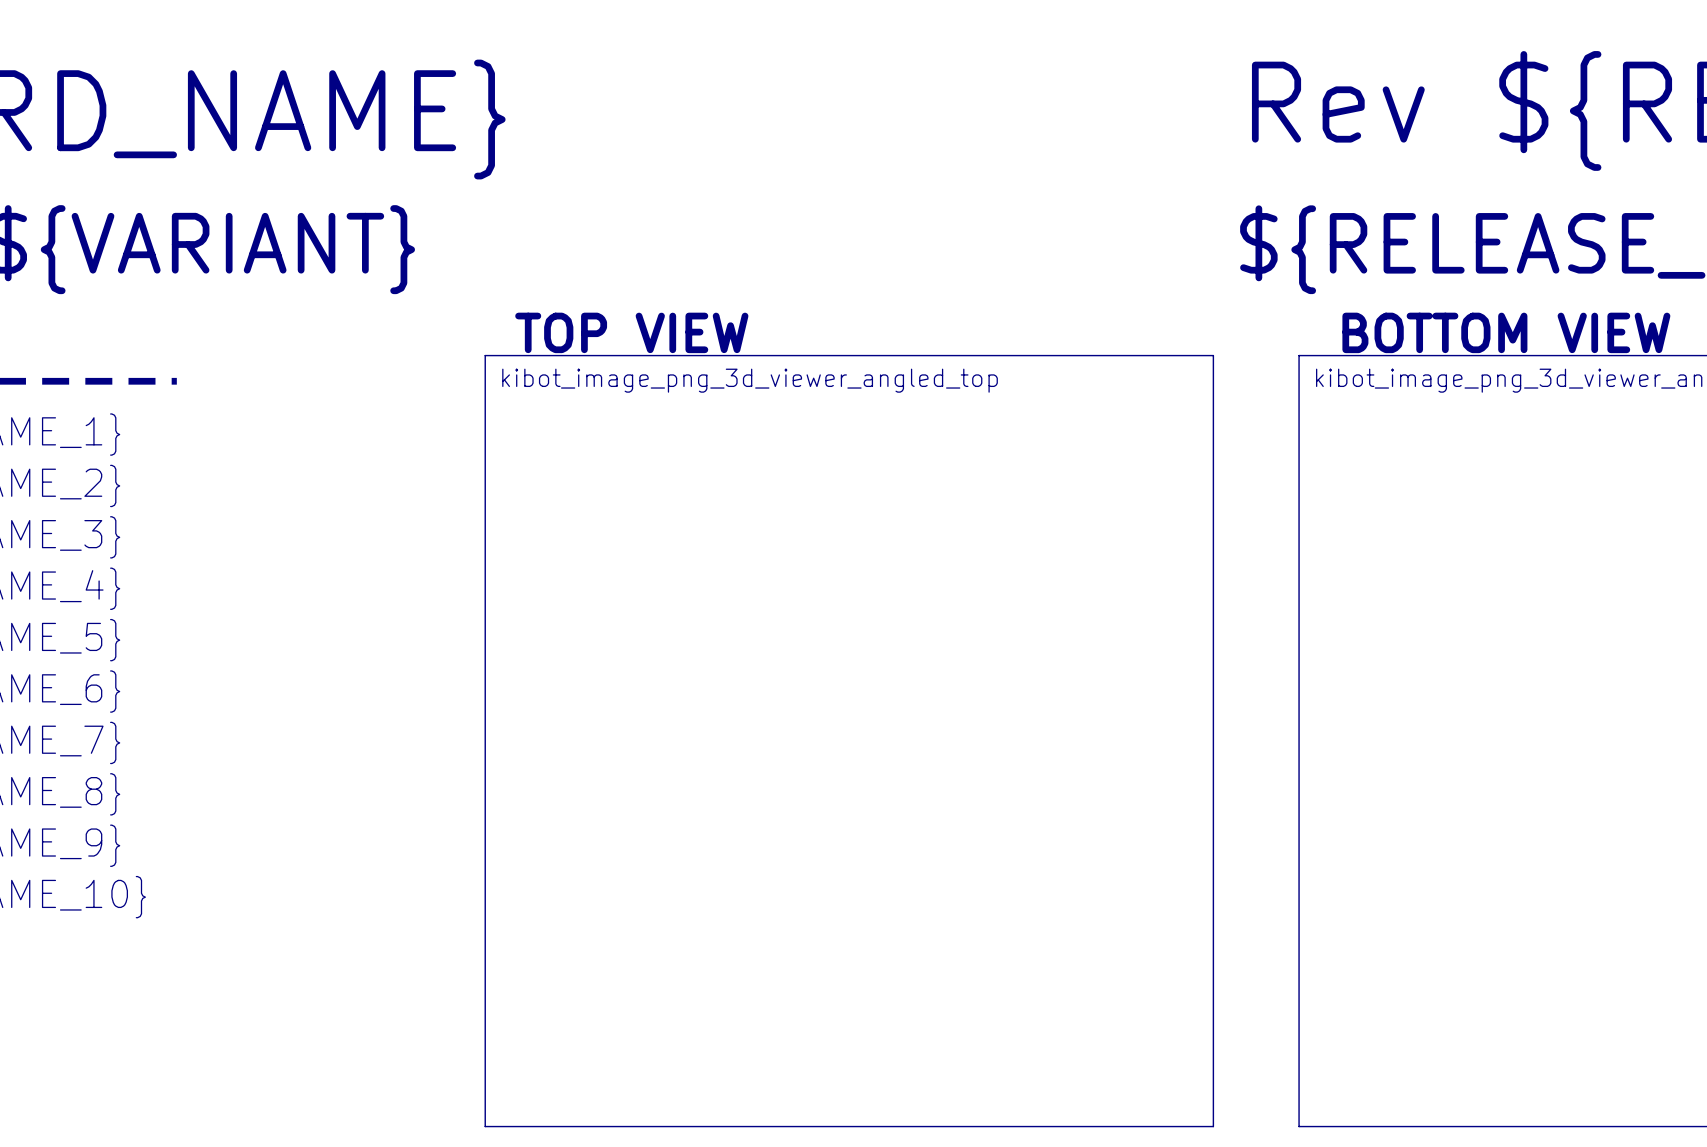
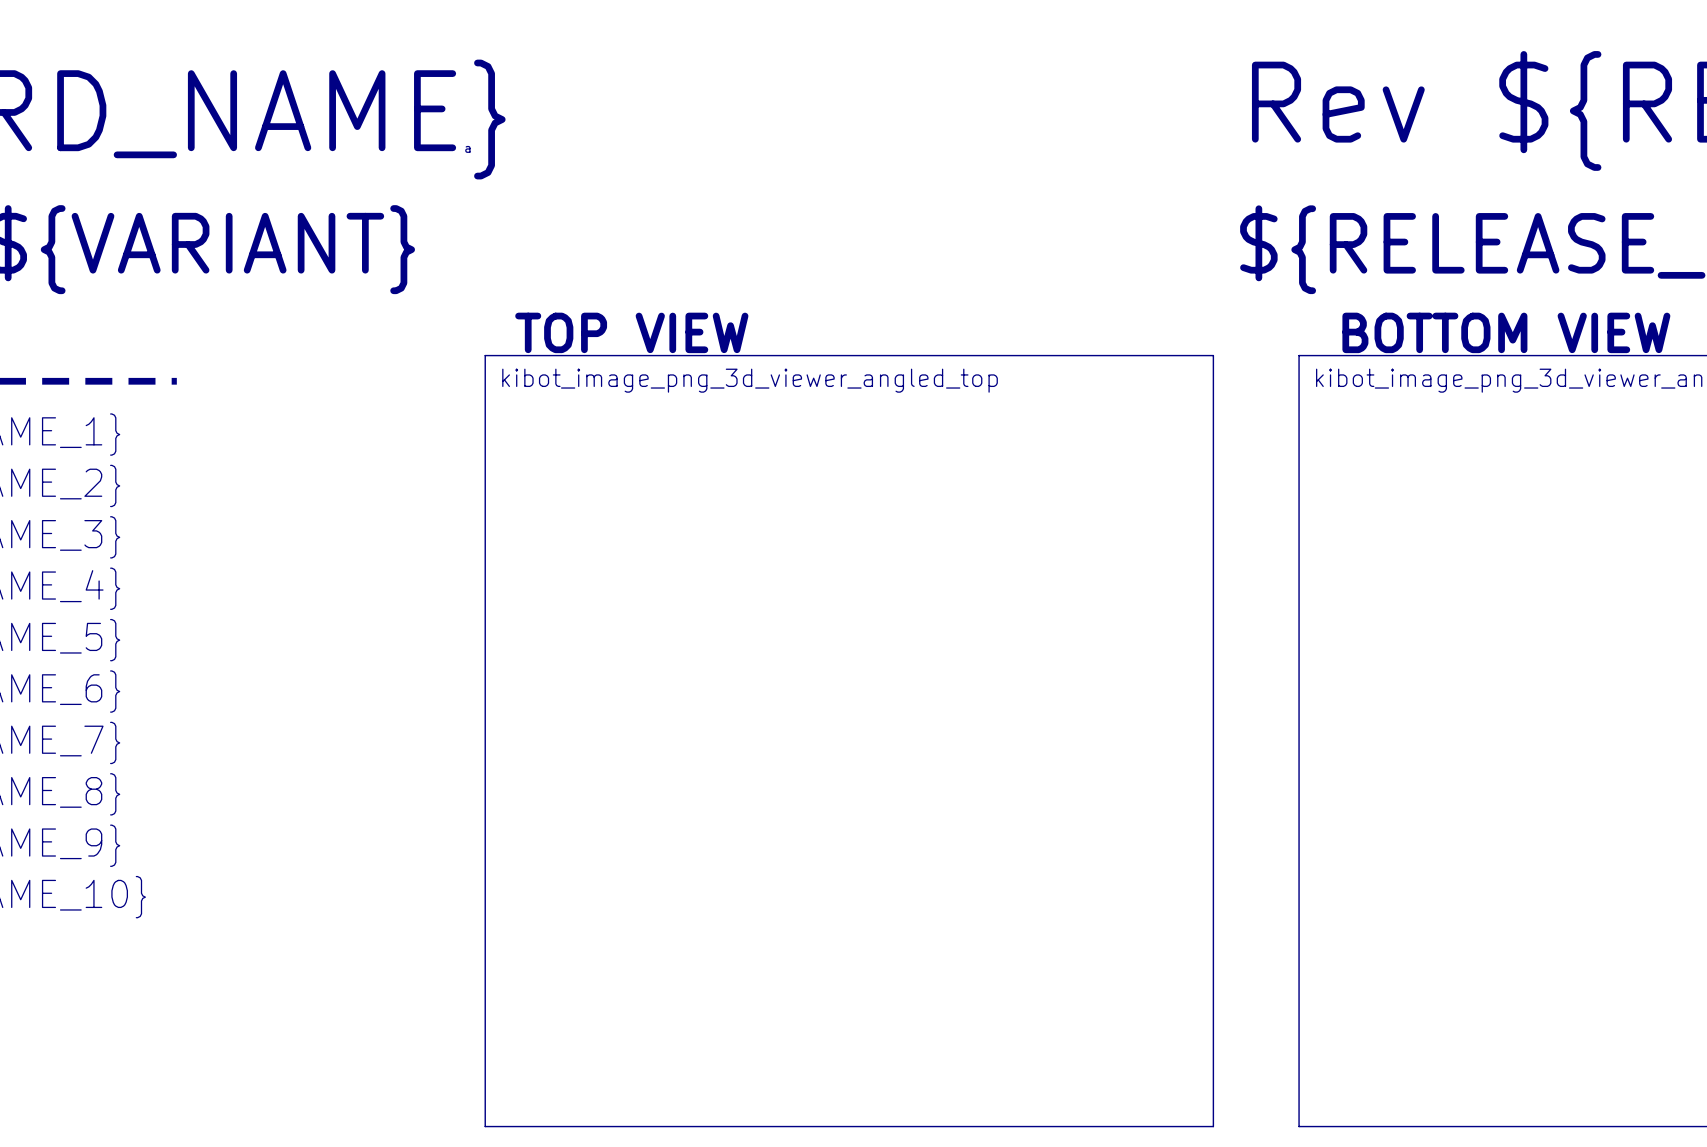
text: none -> a (467, 149)

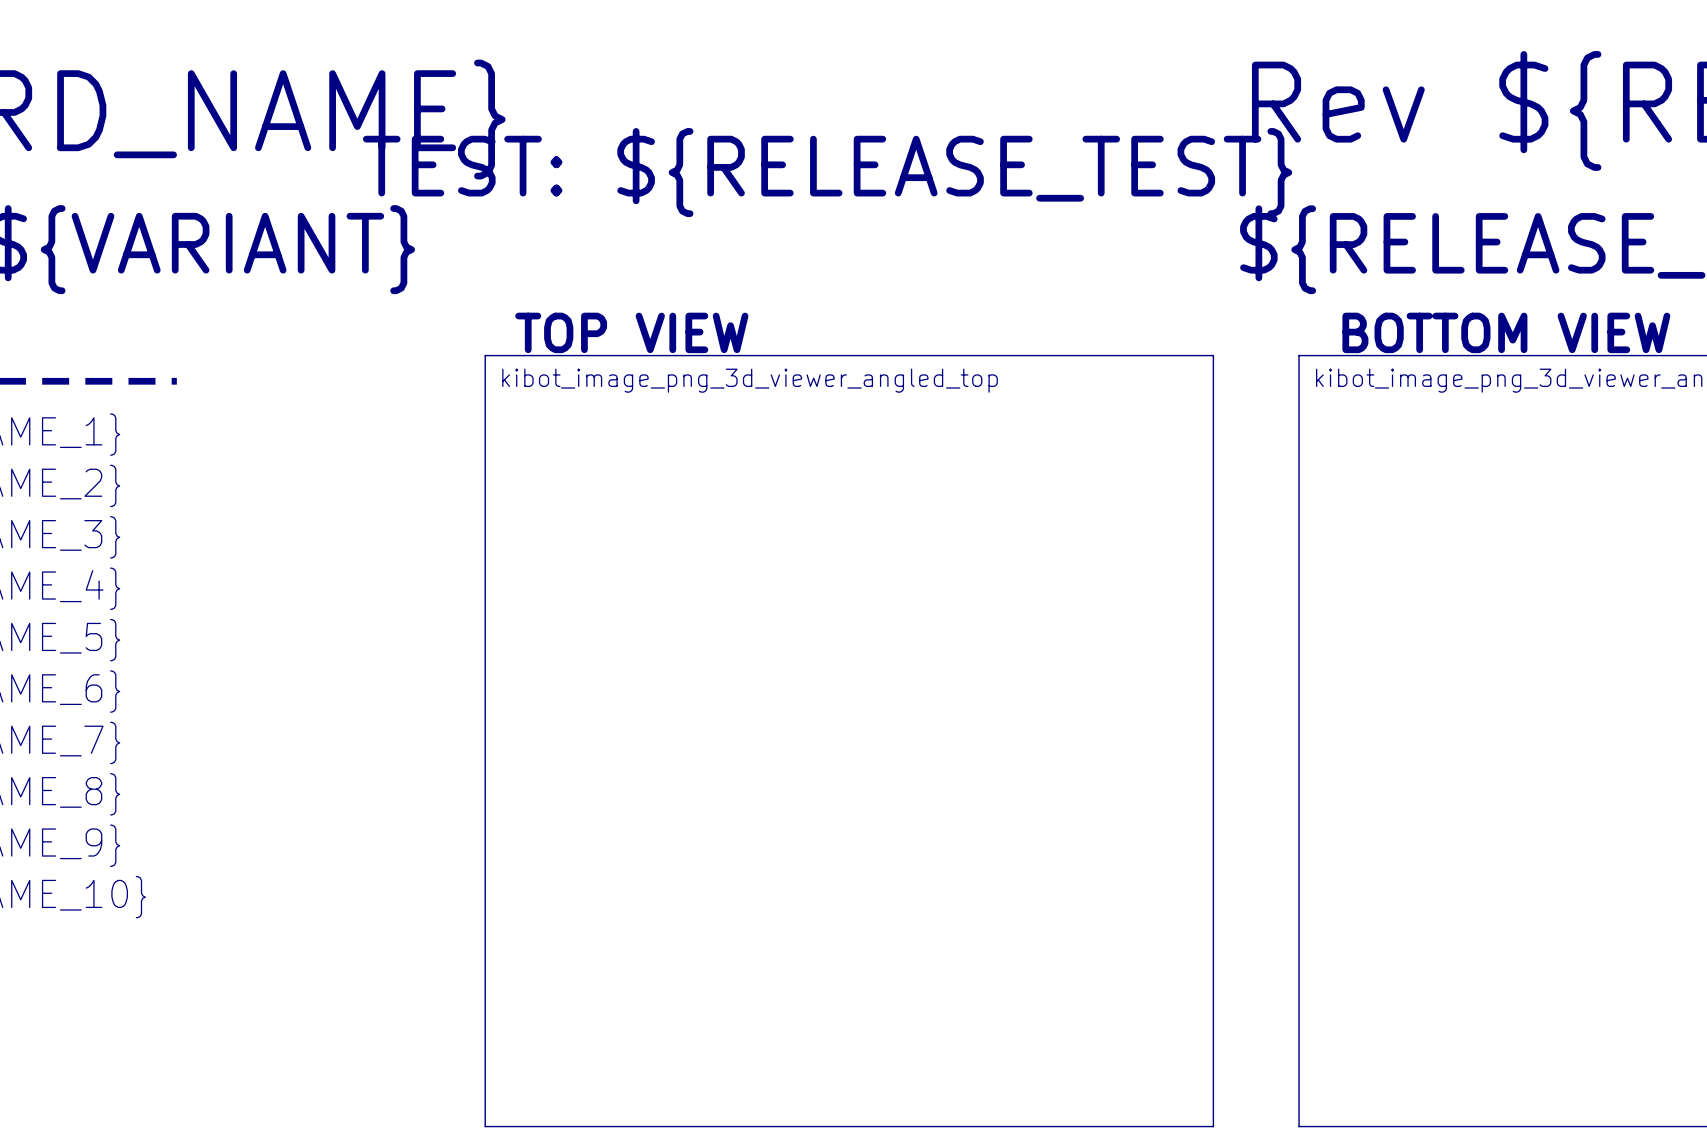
text: a (467, 149) -> none
text: none -> TEST: ${RELEASE_TEST} (827, 172)

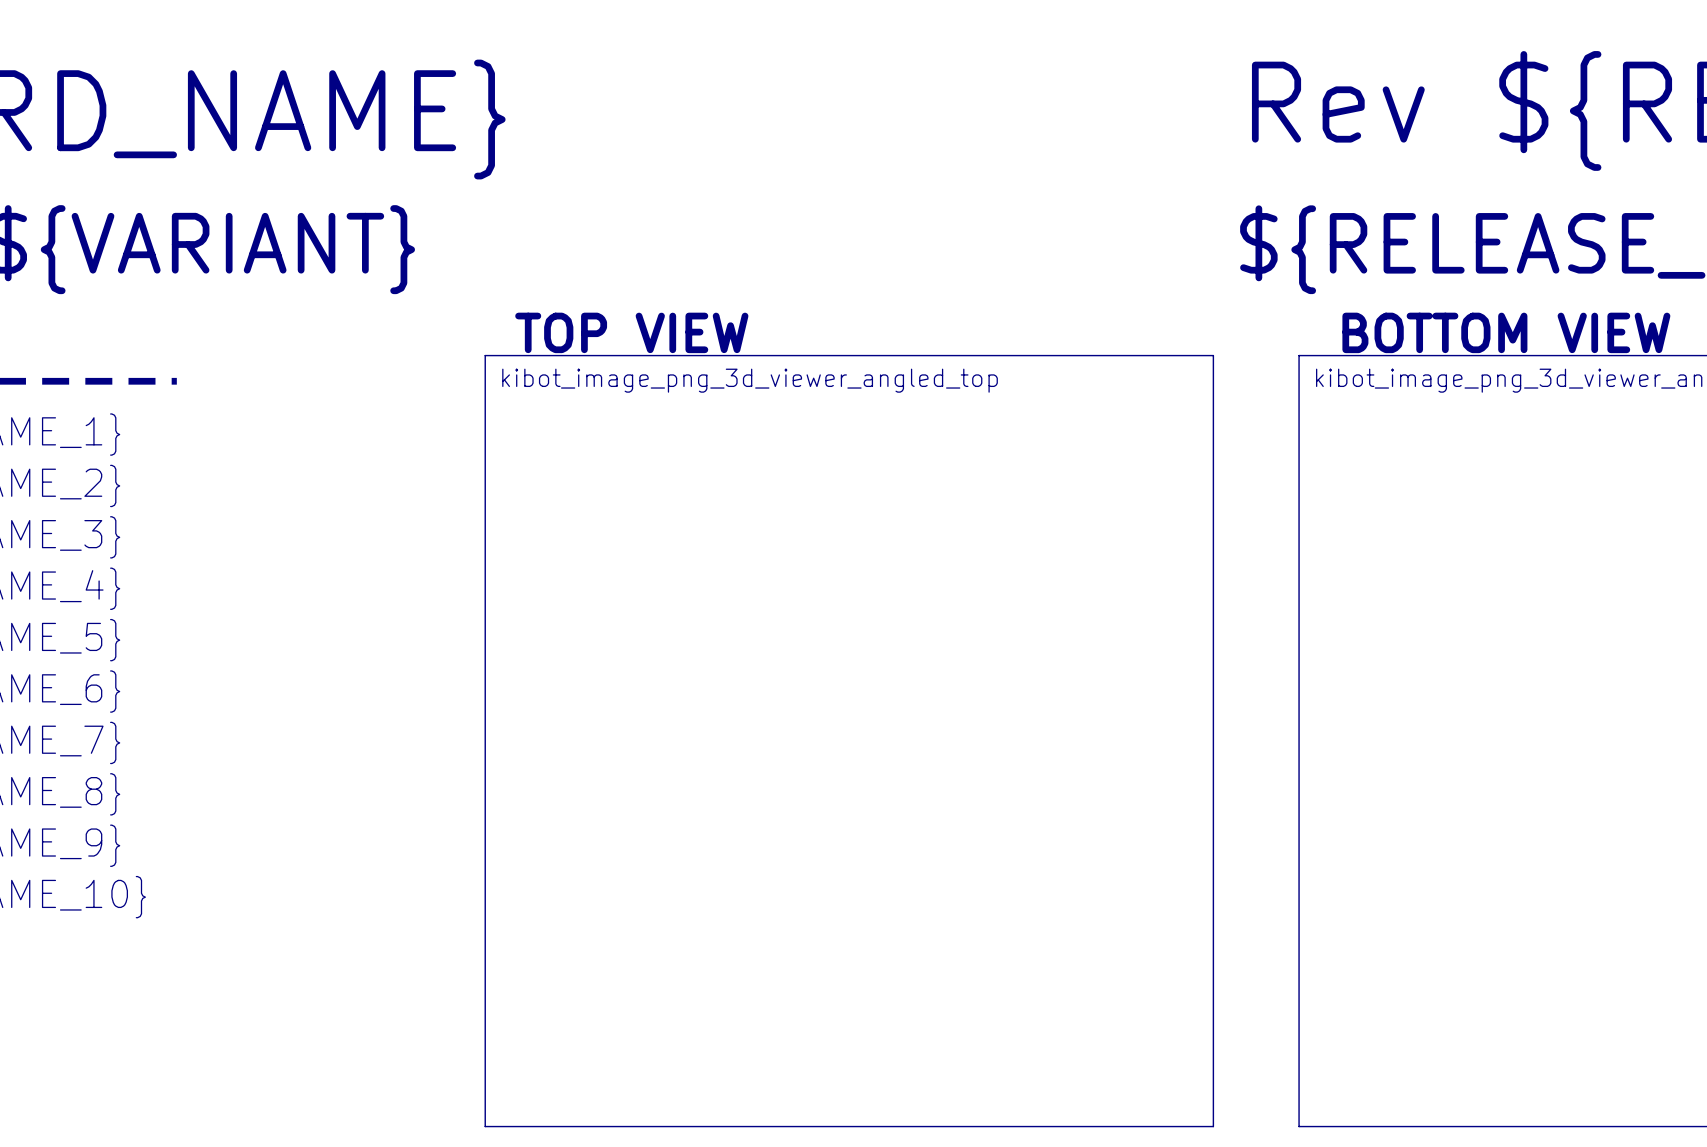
text: TEST: ${RELEASE_TEST} (827, 172) -> none

